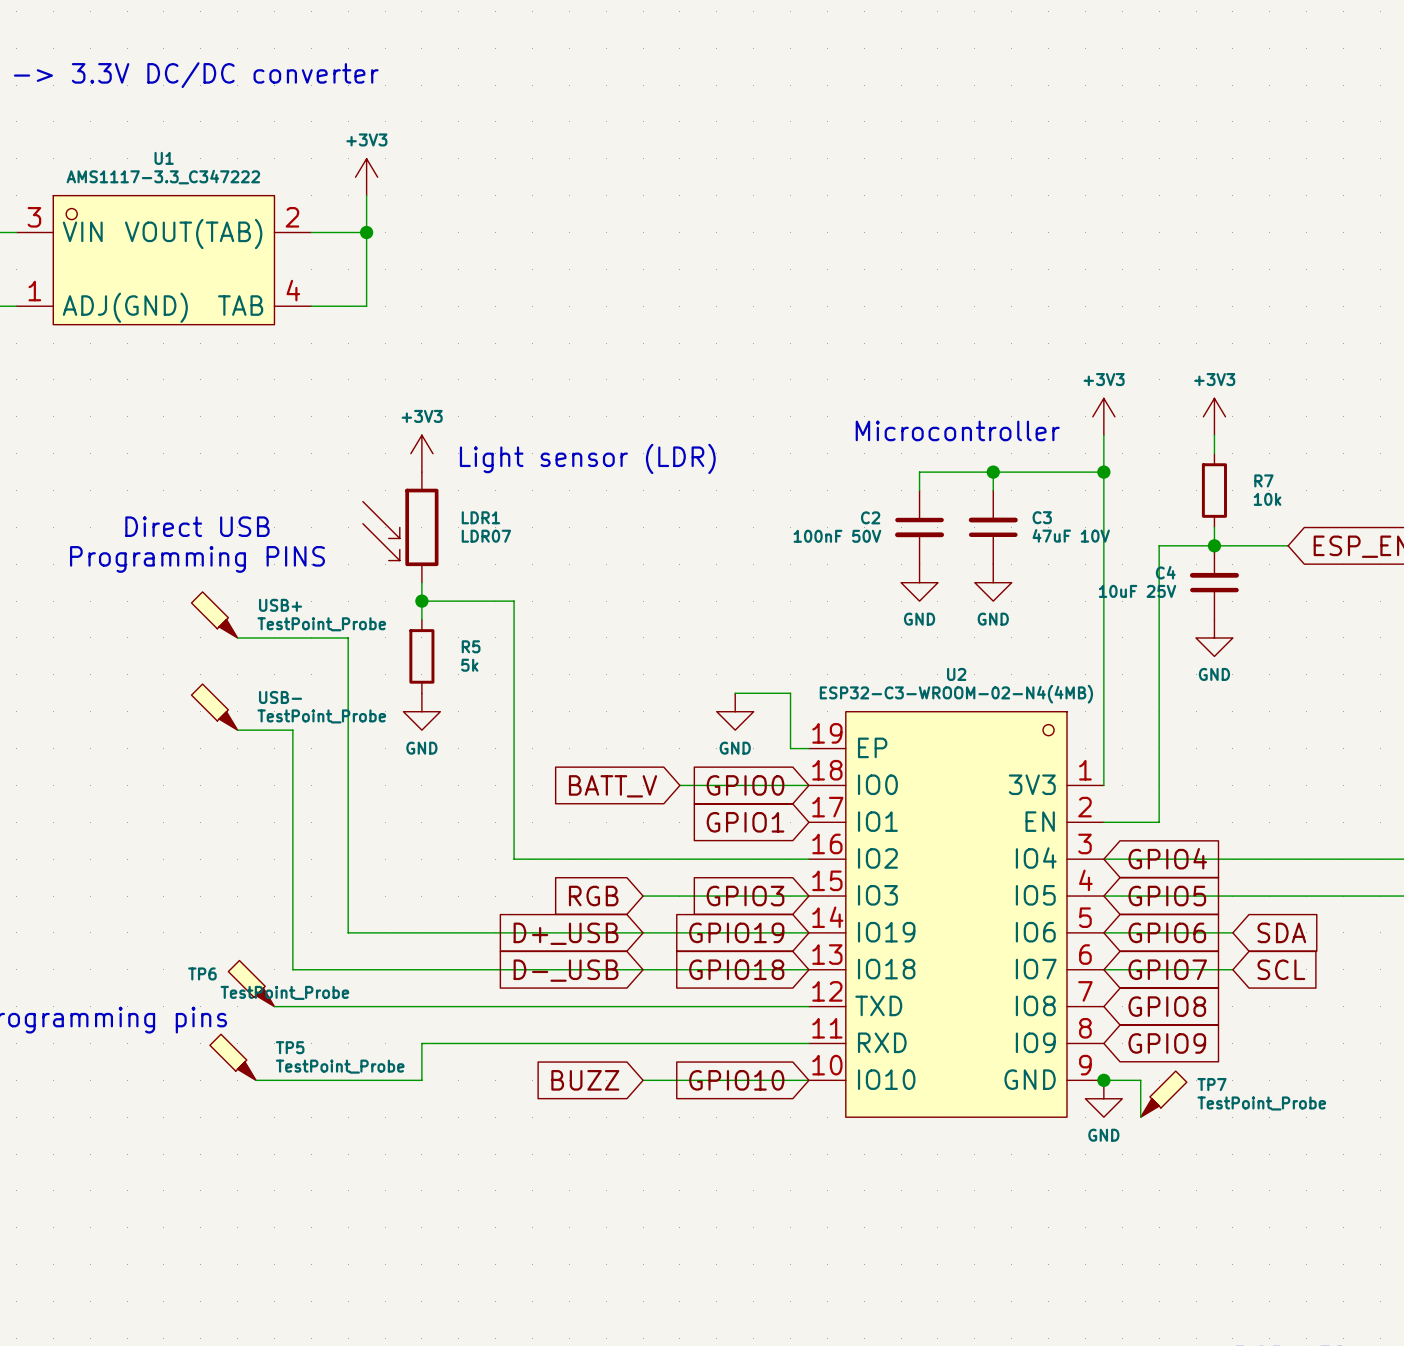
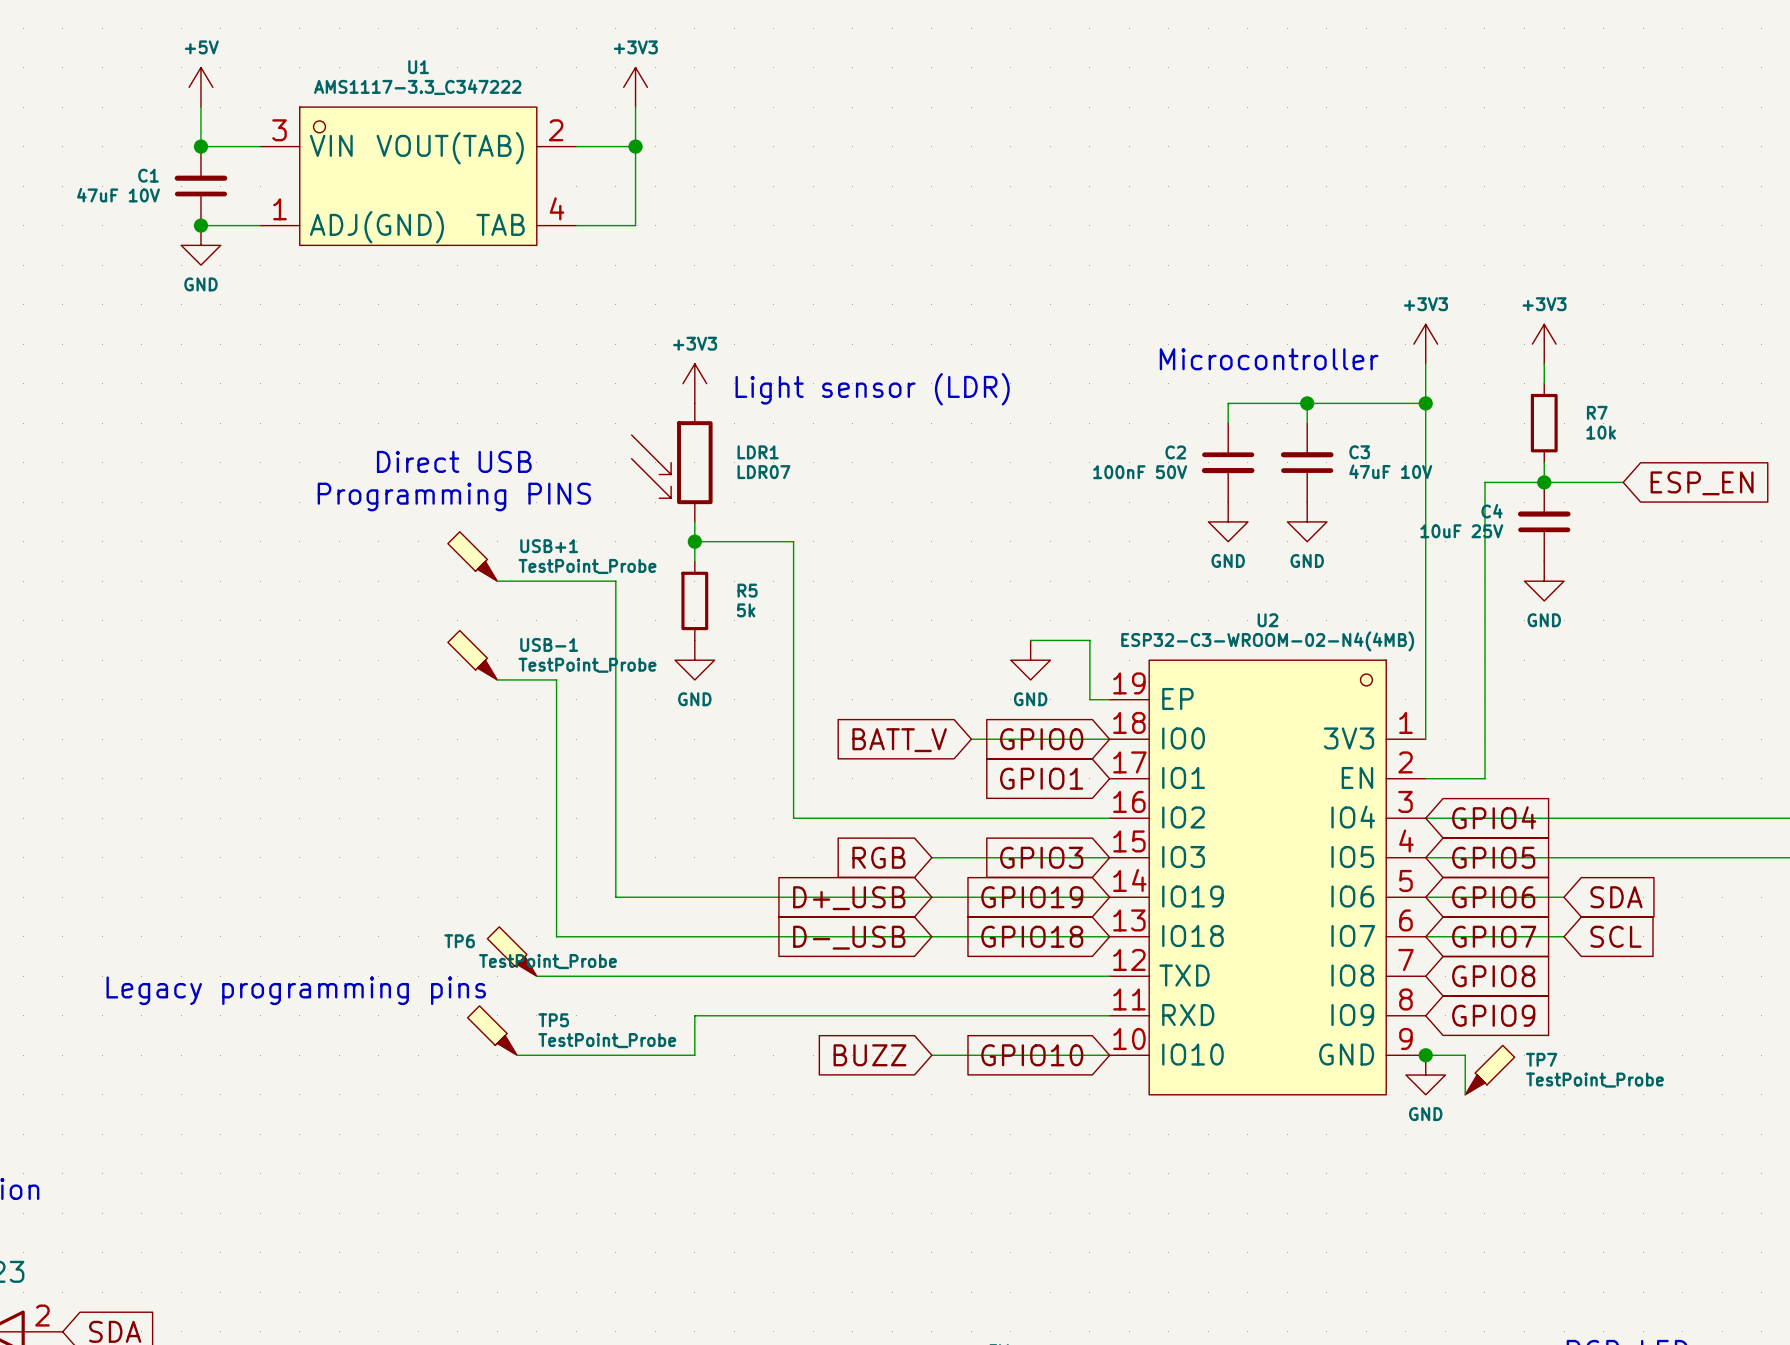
USB+ name: USB+ (280, 605) -> USB+1 (549, 546)
USB- name: USB- (280, 697) -> USB-1 (549, 644)

